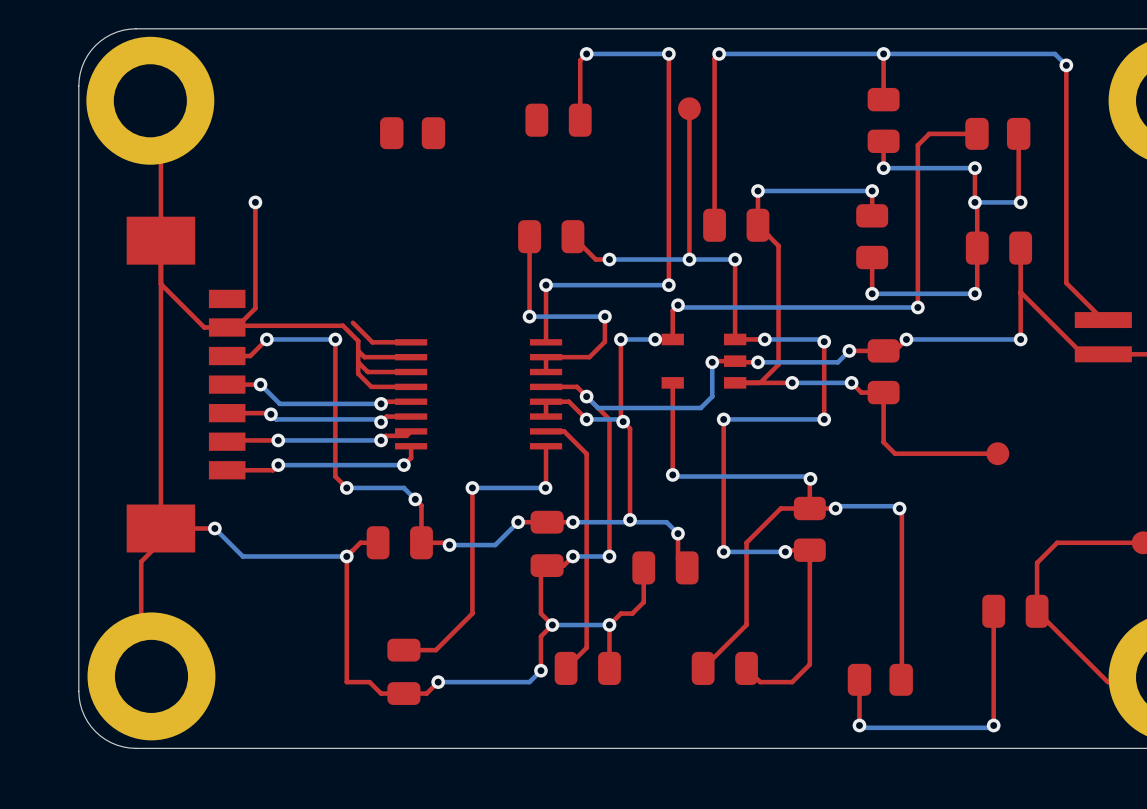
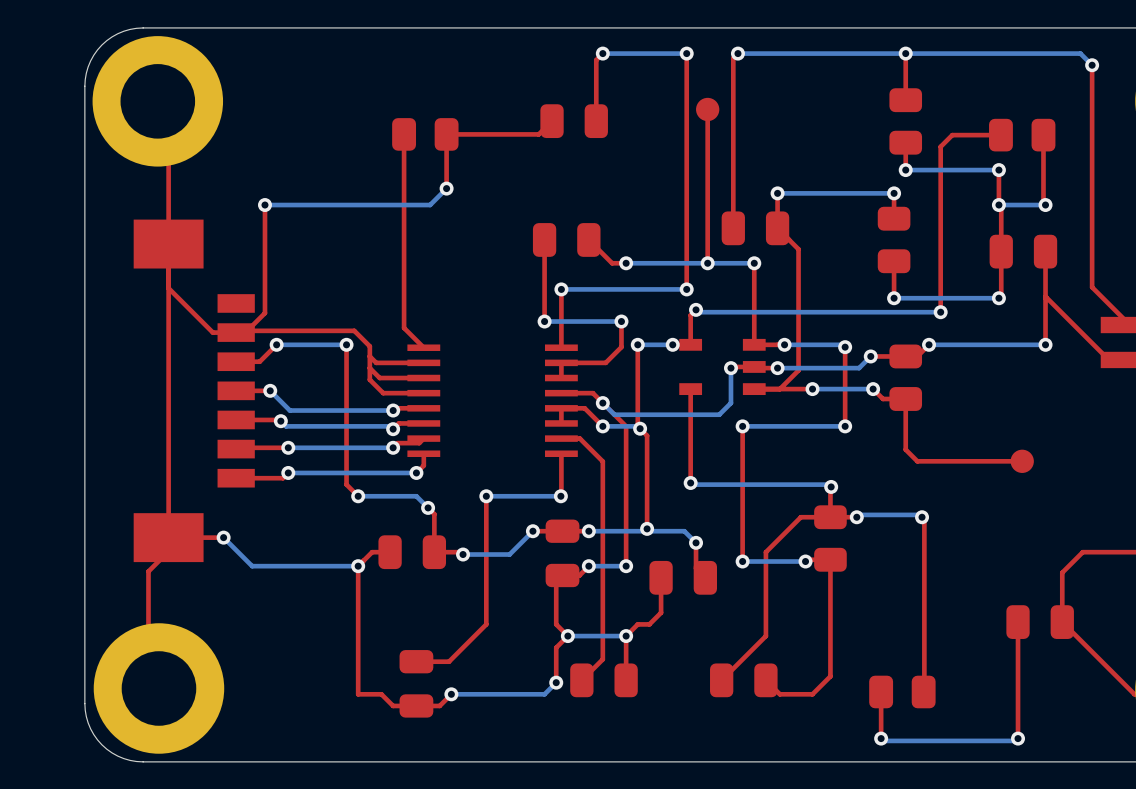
top track: none -> (552, 121) (538, 134) (446, 134) (446, 188)
bottom track: none -> (446, 188) (430, 205) (264, 205)
via: none -> (446, 188)
top track: (352, 322) (372, 342) (411, 342) -> (404, 134) (404, 327) (423, 347)

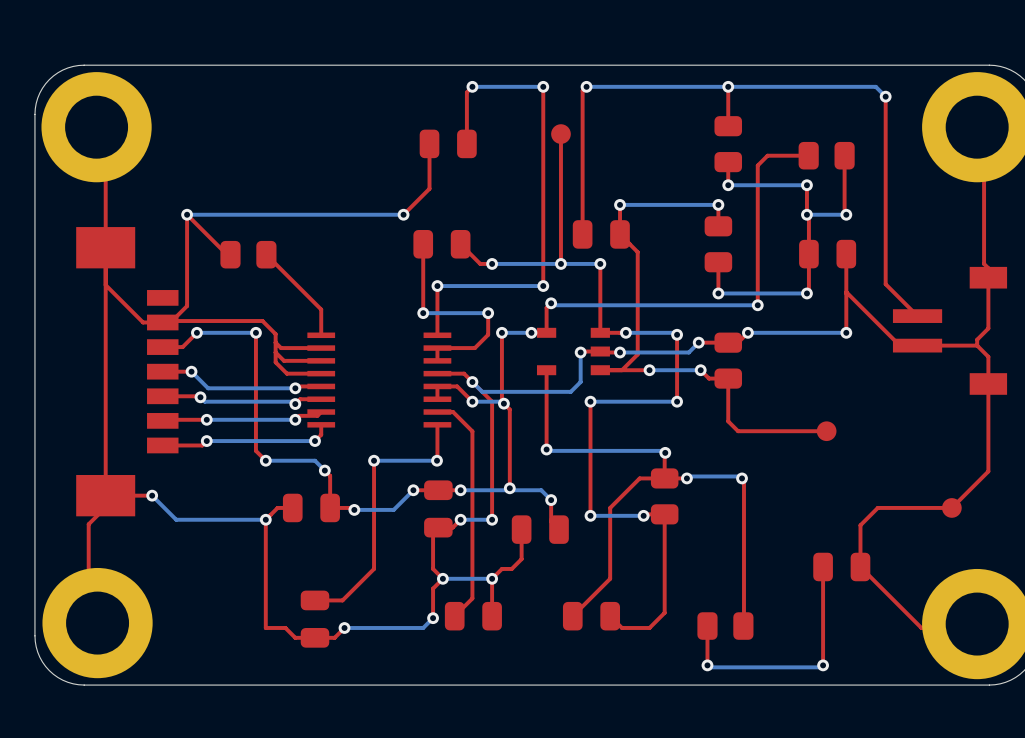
top track: (552, 121) (538, 134) (446, 134) (446, 188) -> (429, 143) (429, 188) (403, 214)
part position: (425, 134) -> (248, 254)
top track: (404, 135) (404, 327) (423, 347) -> (265, 254) (321, 309) (321, 335)
bottom track: (446, 188) (430, 205) -> (403, 214) (326, 214)
via position: (446, 188) -> (403, 214)
top track: none -> (187, 214) (227, 254) (230, 254)

